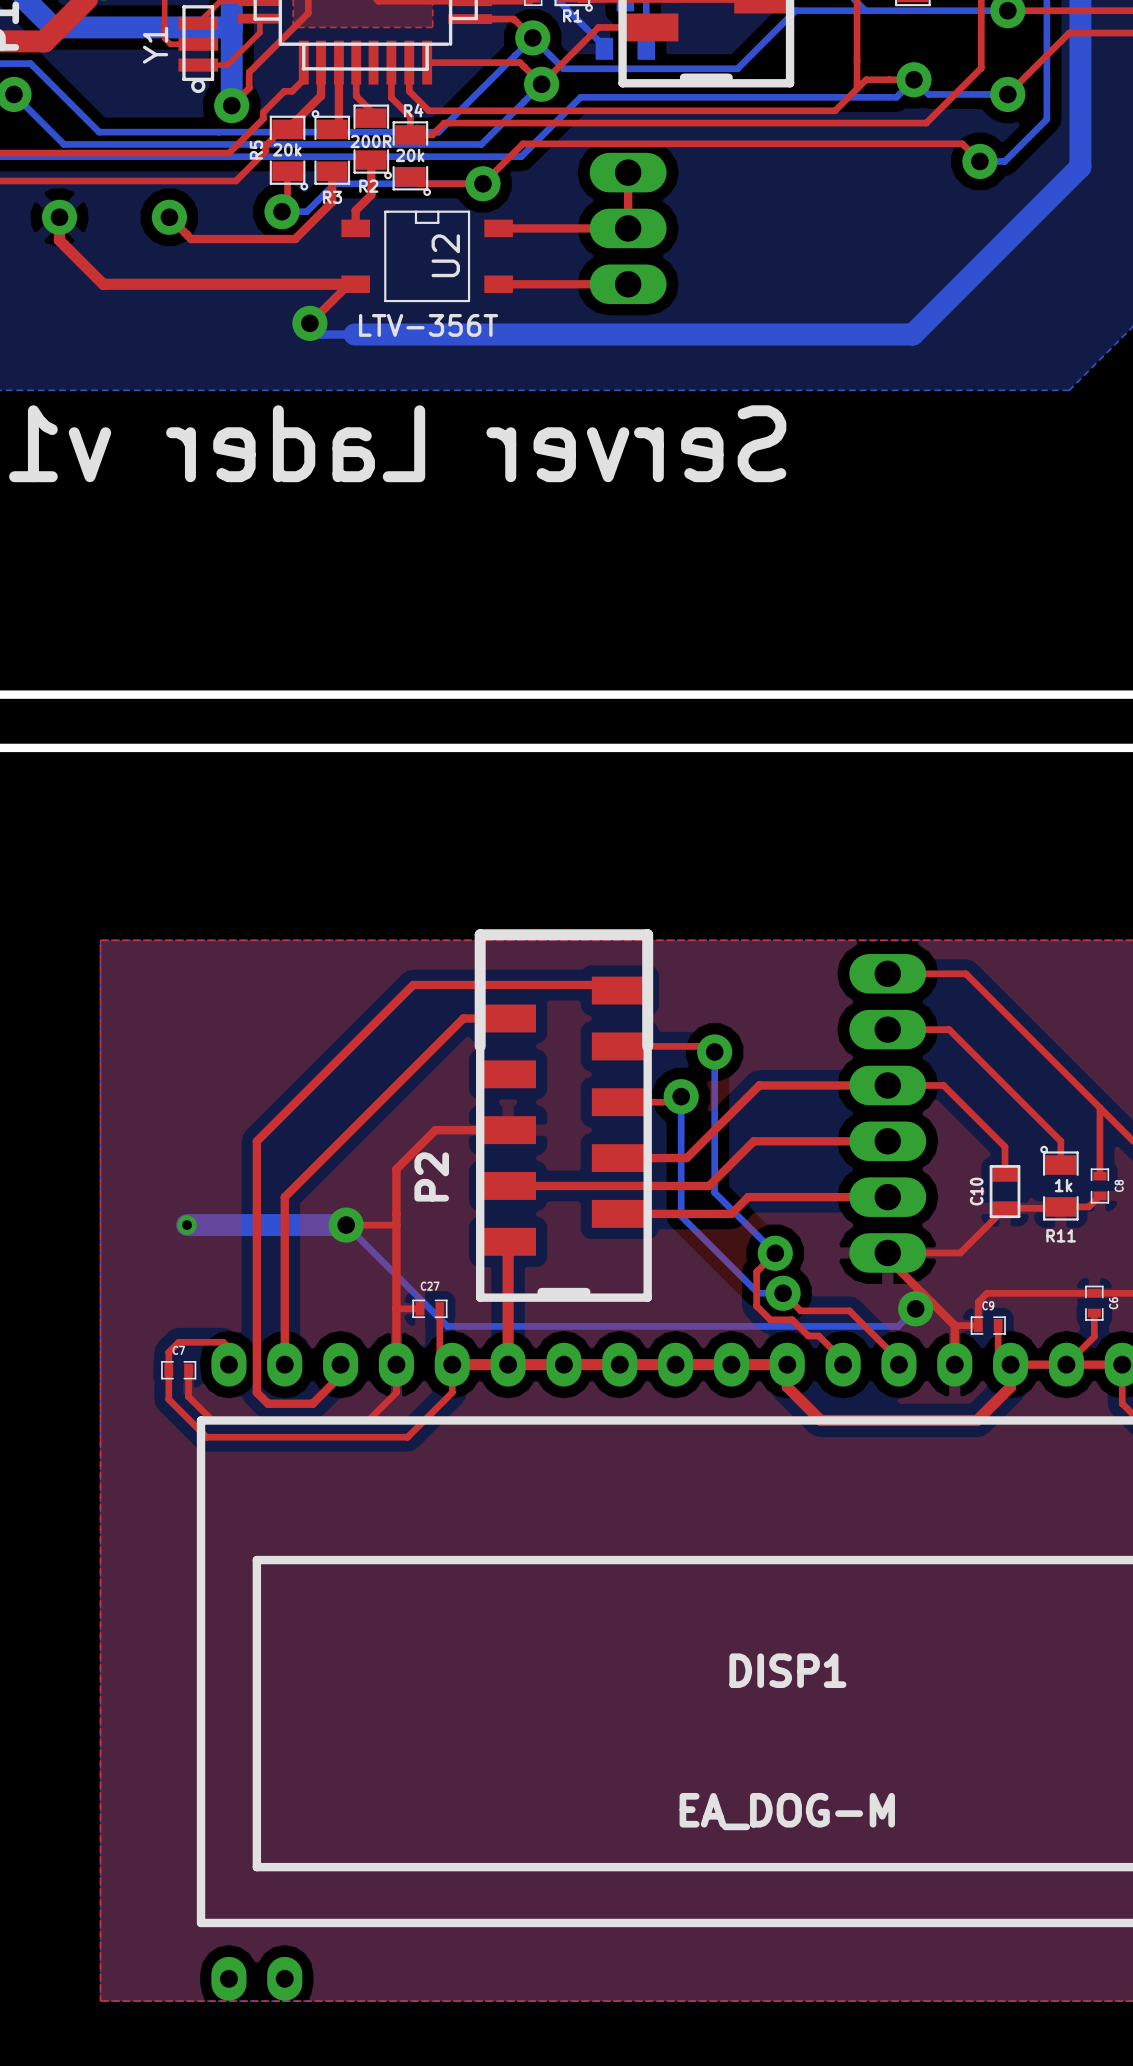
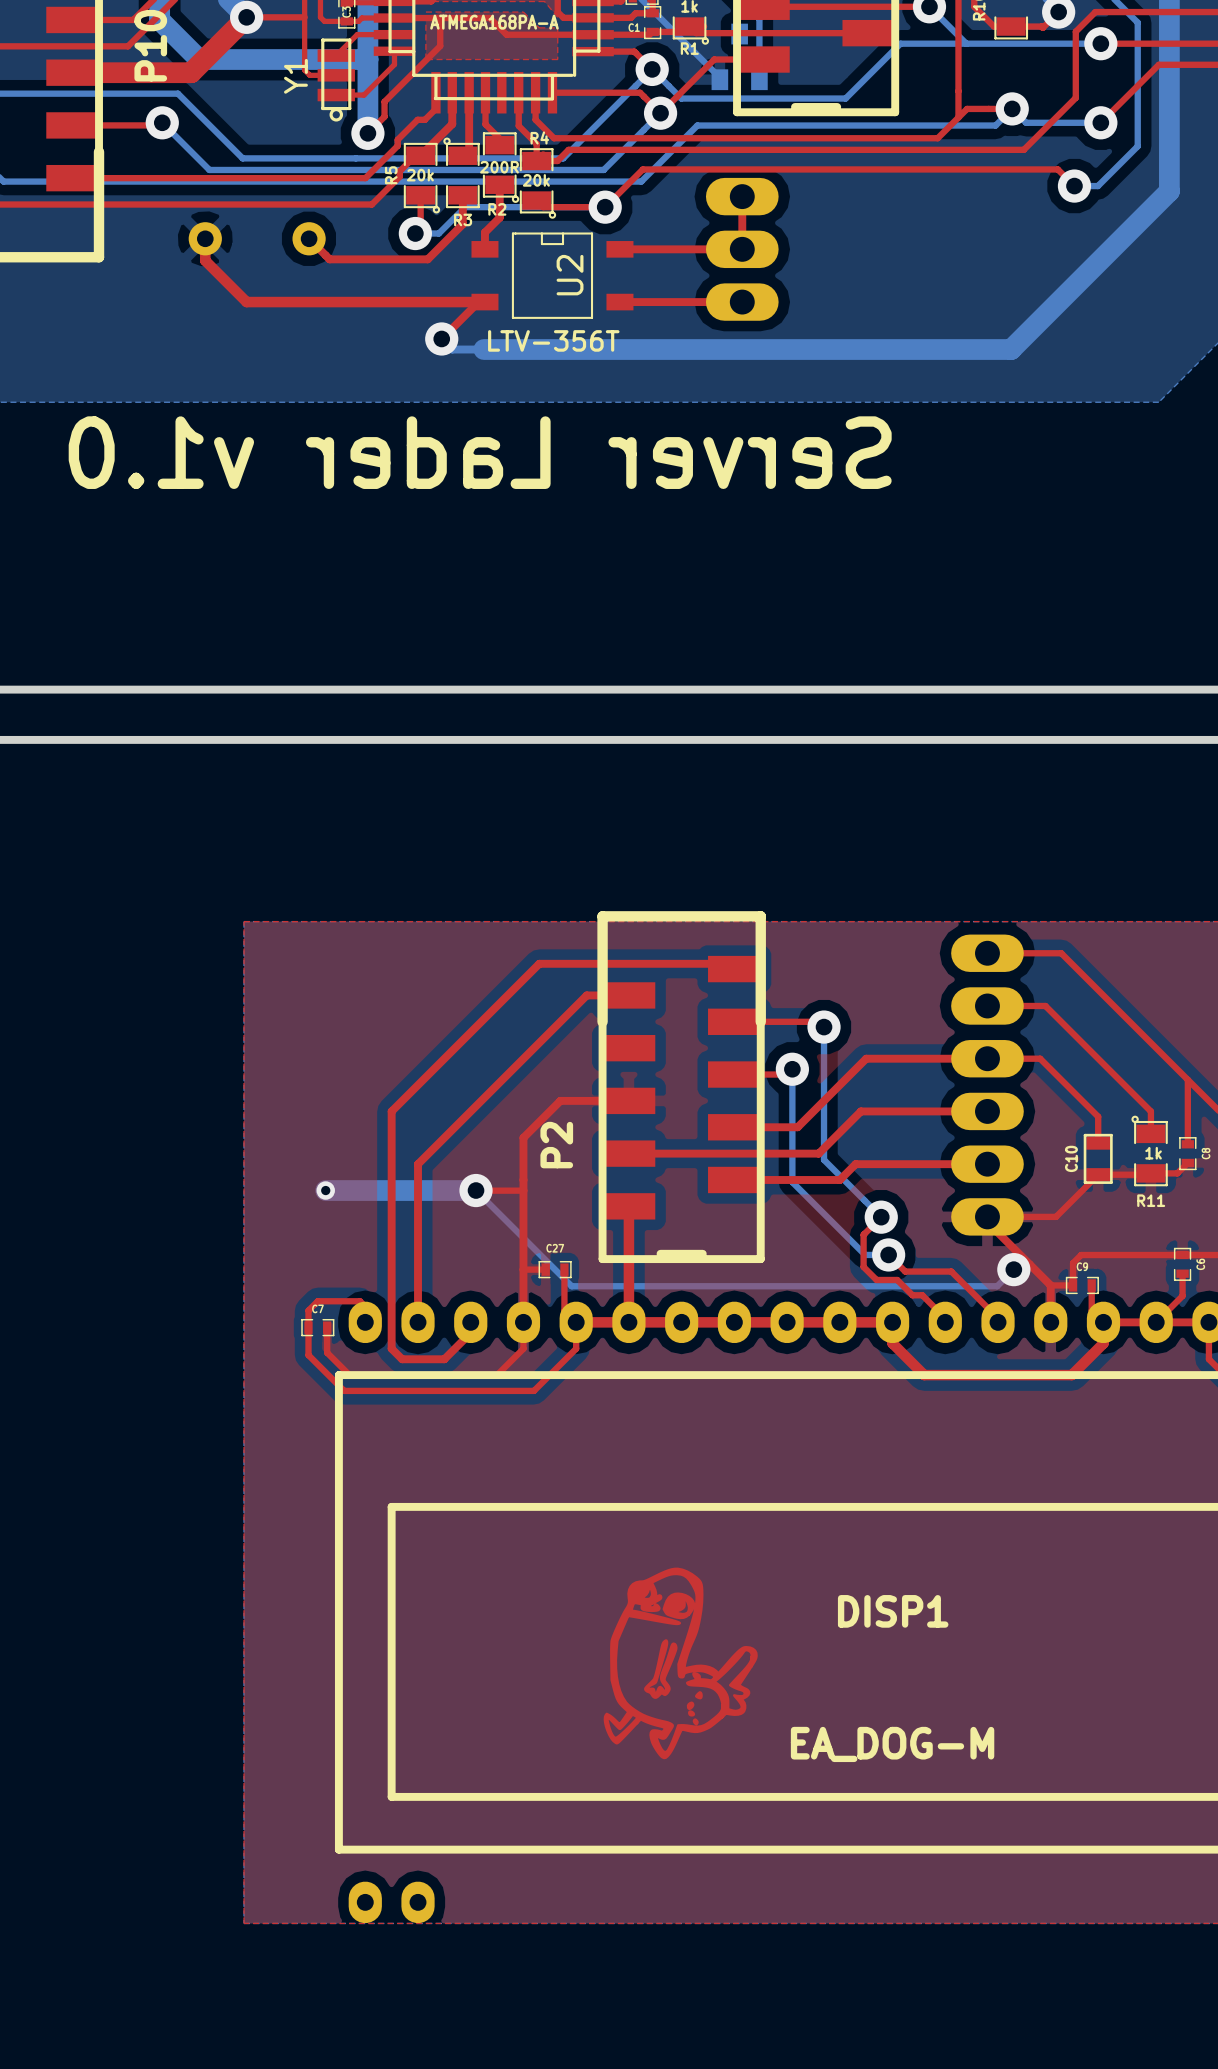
drawing: none -> [603, 1567, 758, 1760]

